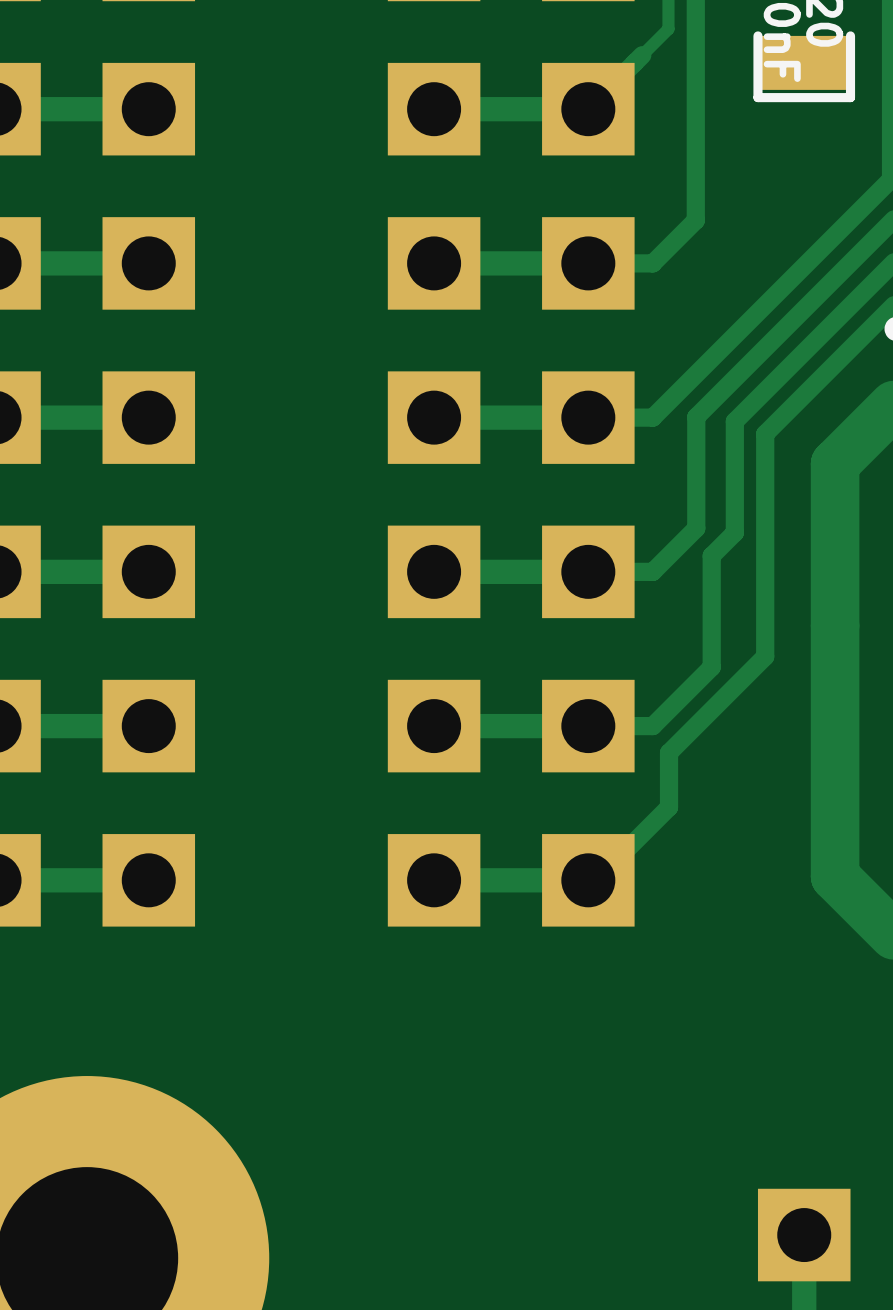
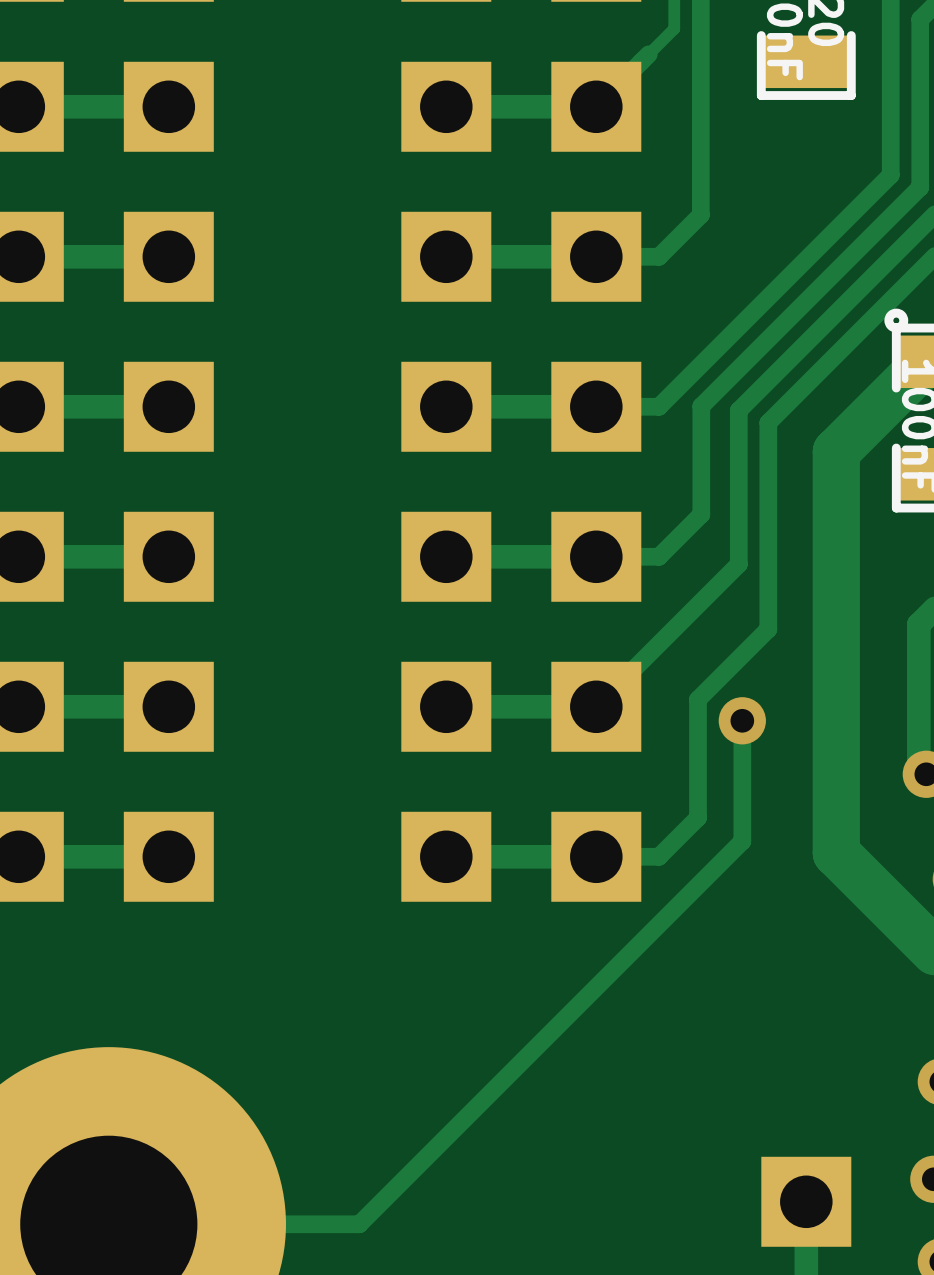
track: (734, 532) (711, 555) (711, 667) (652, 726) (588, 726) -> (738, 518) (738, 564) (596, 706)
track: (765, 646) (765, 656) (669, 752) (669, 807) (596, 880) -> (768, 629) (698, 699) (698, 817) (659, 856) (603, 856)
track: none -> (742, 720) (742, 841) (359, 1224) (108, 1224)
via: none -> (742, 720)

